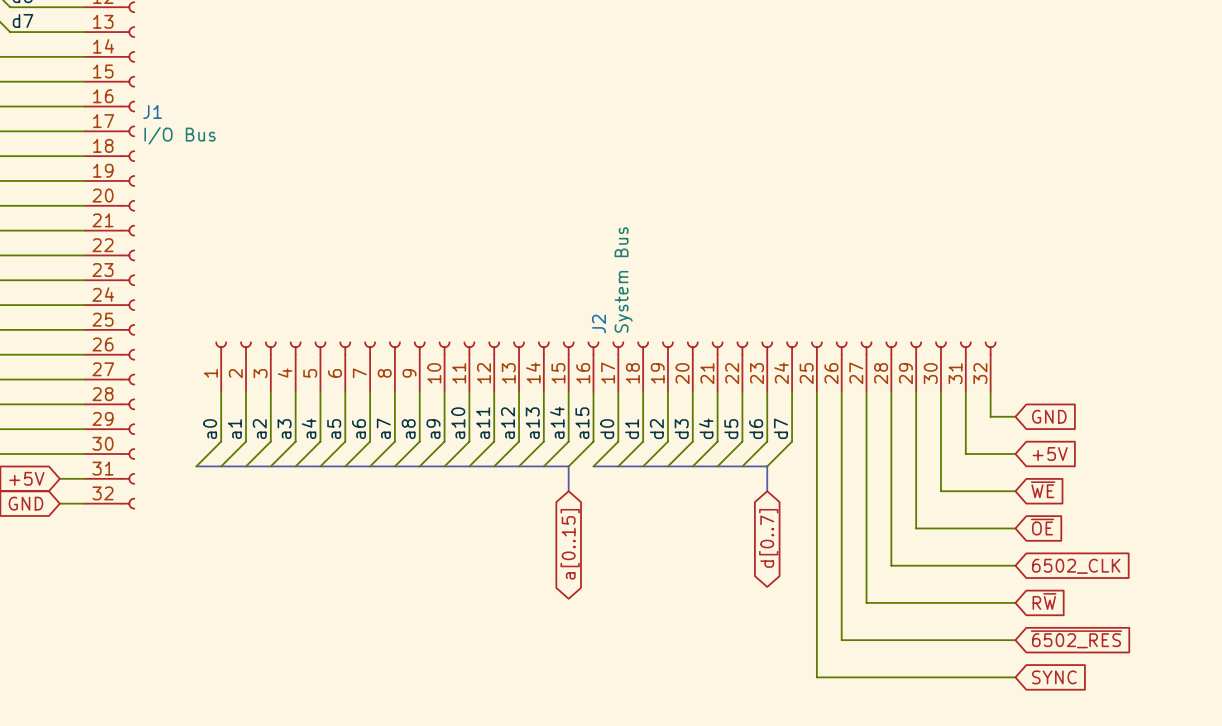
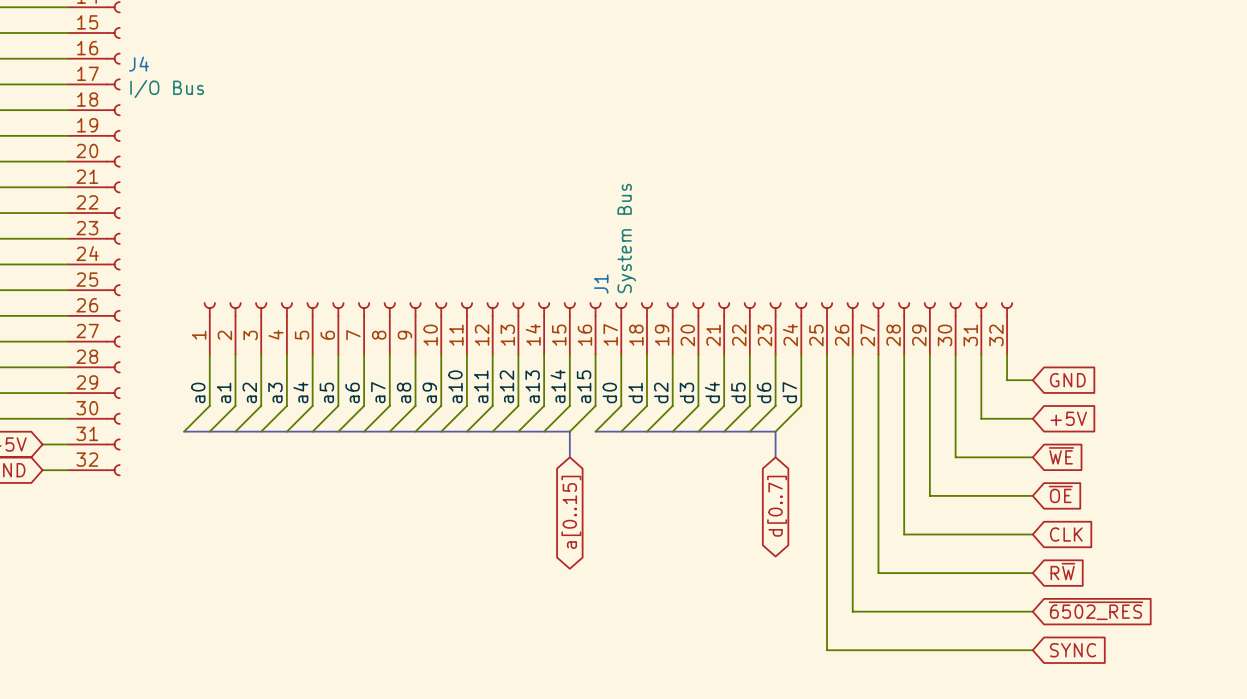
J1 name: J1 (152, 112) -> J4 (139, 64)
J2 name: J2 (598, 324) -> J1 (601, 284)
global label: 6502_CLK (1076, 566) -> CLK (1066, 534)

